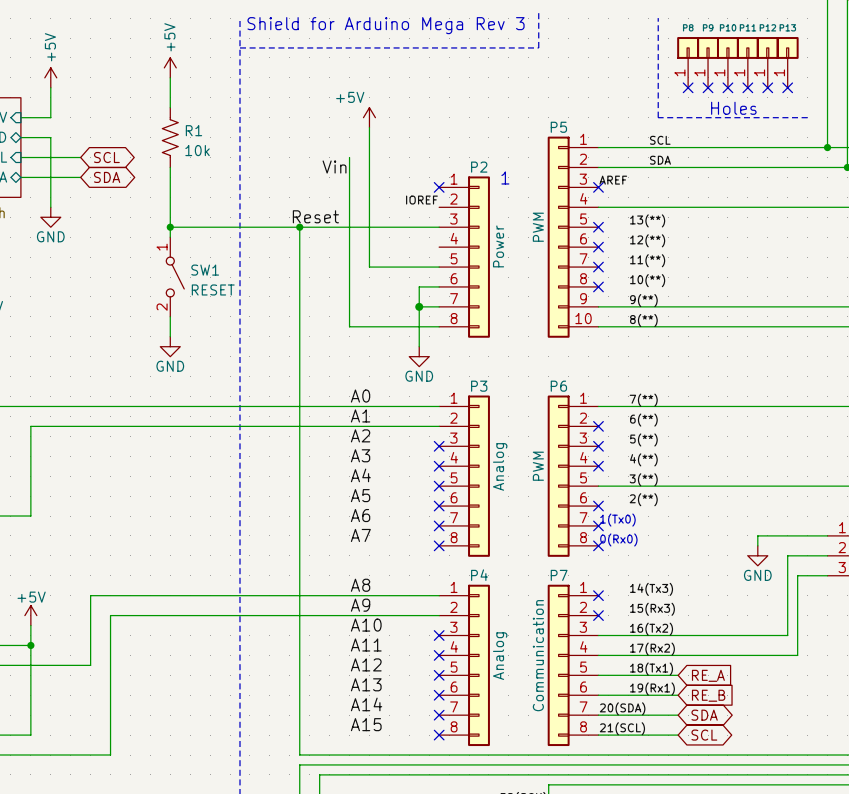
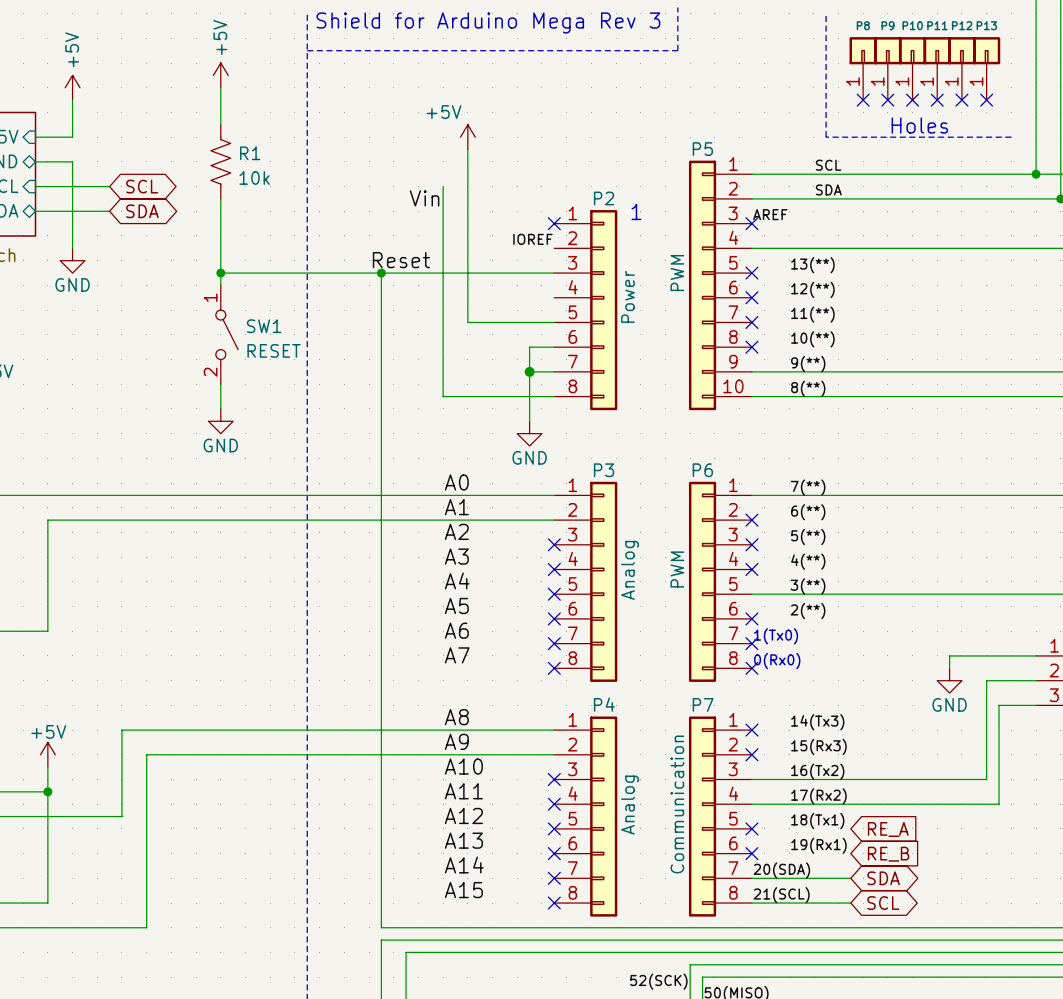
wire: (598, 675) (678, 675) -> none
no-connect mark: none -> (751, 828)
wire: (598, 695) (678, 695) -> none
no-connect mark: none -> (751, 853)

